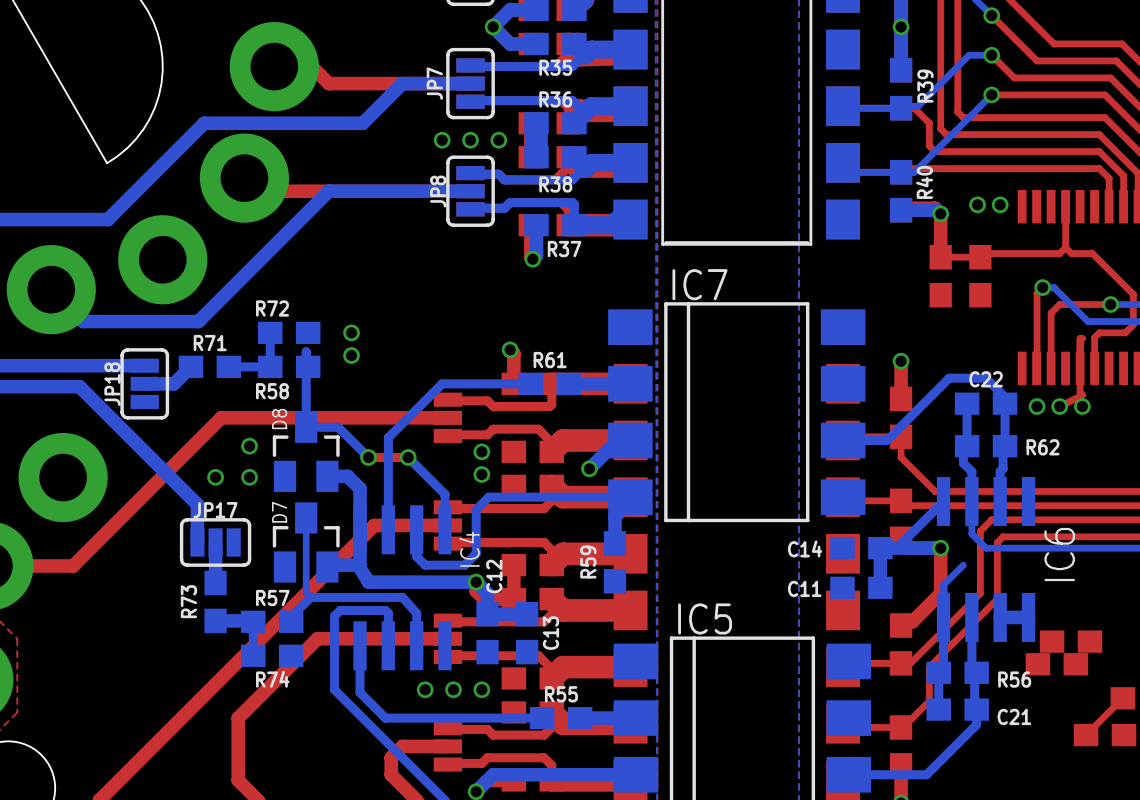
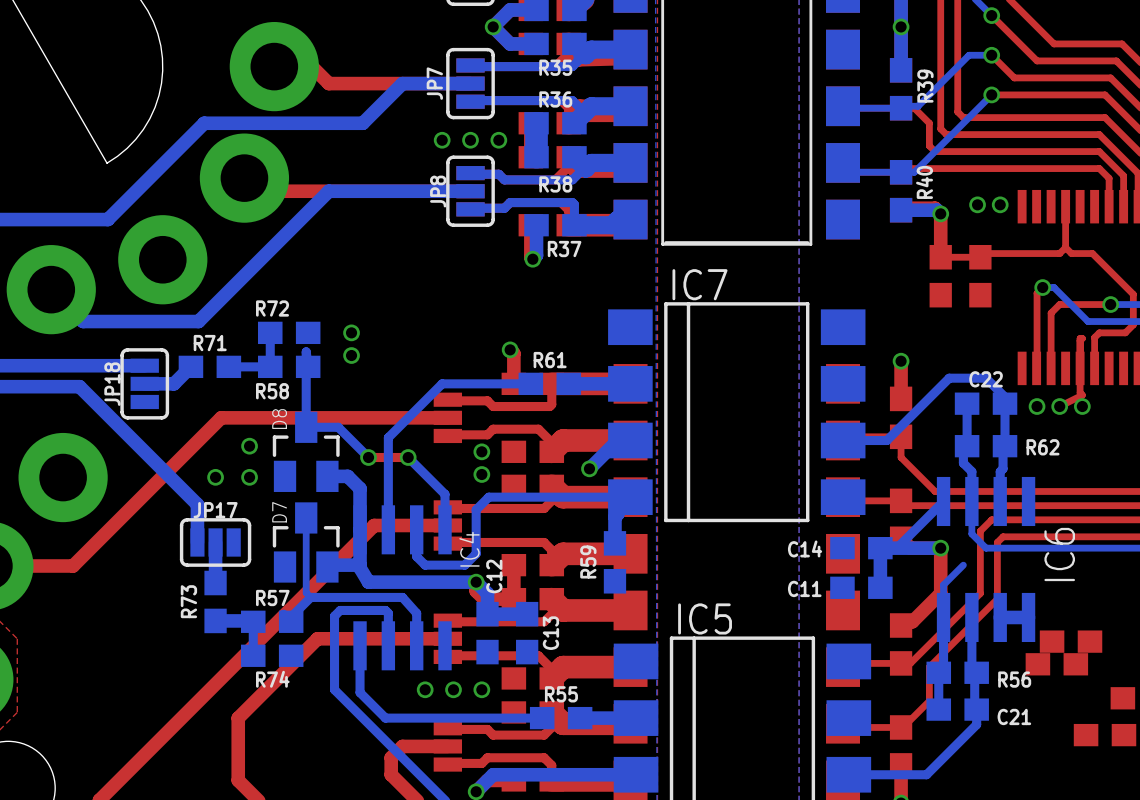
top track: (1122, 698) (1086, 735) -> none

